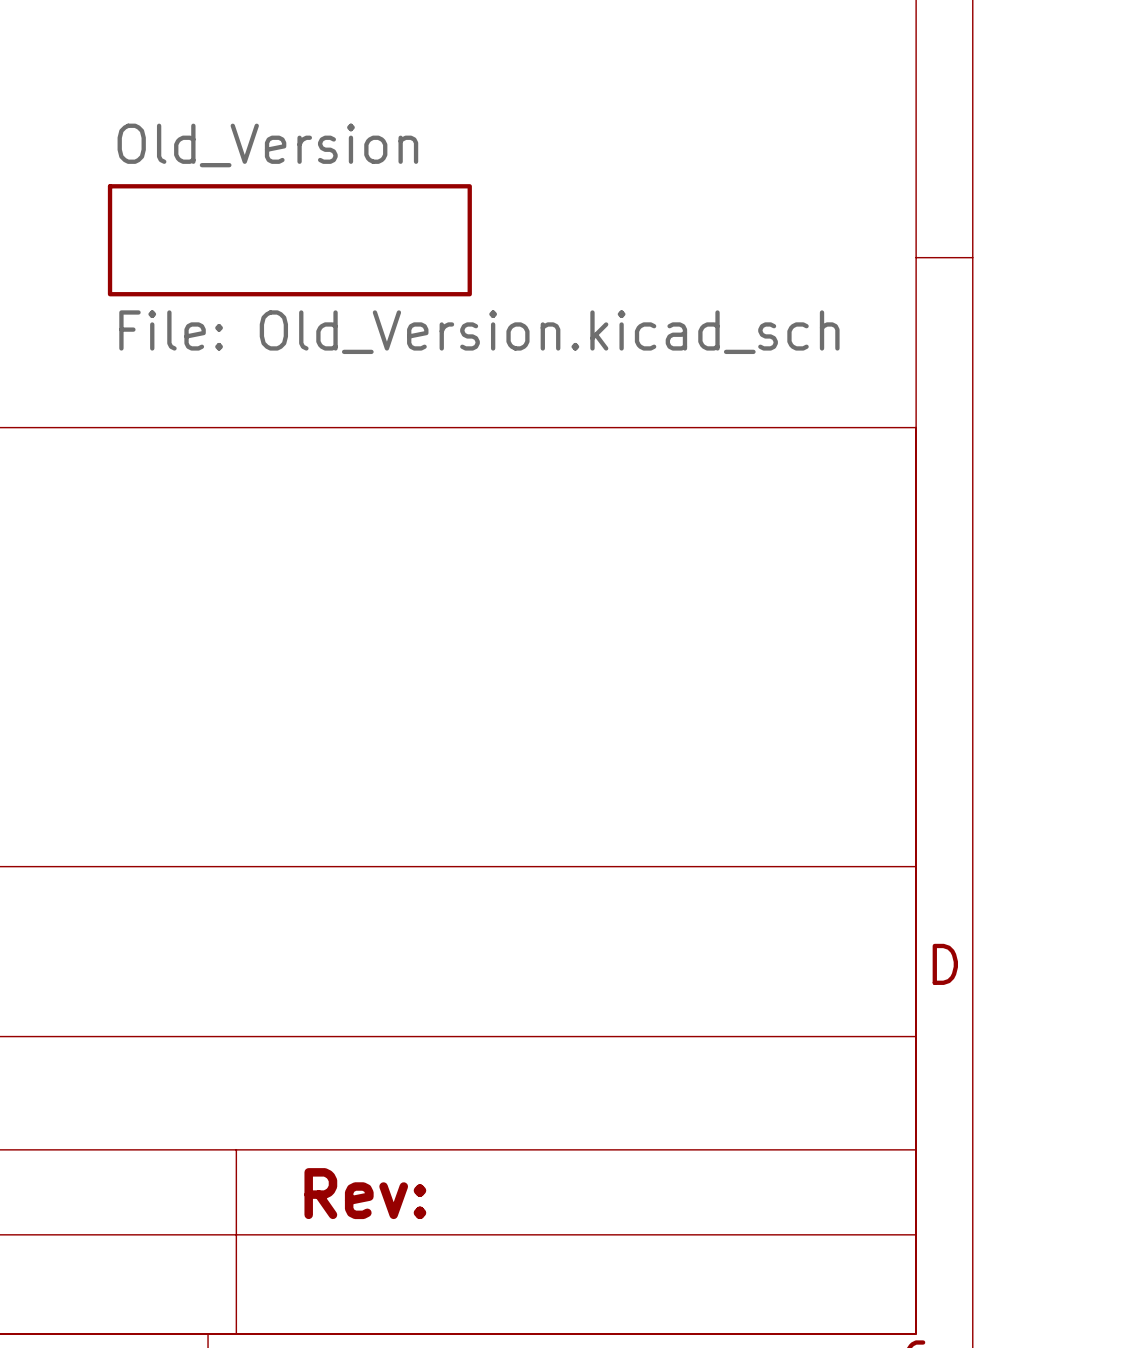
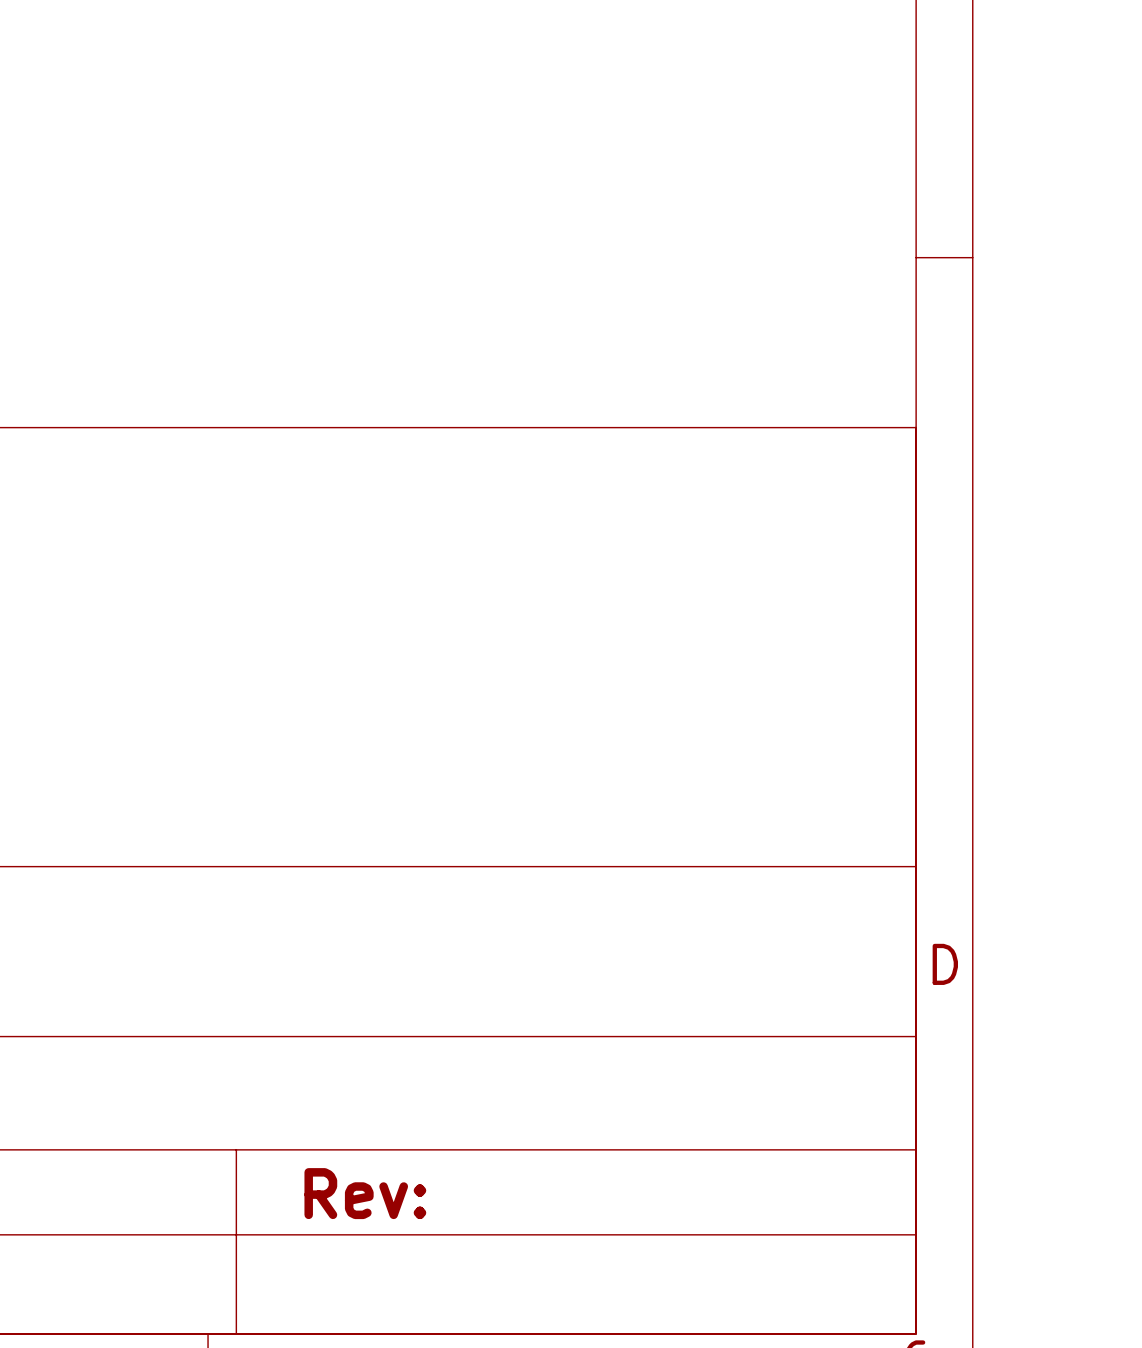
sheet Old_Version: File: Old_Version.kicad_sch (289, 240) -> none

